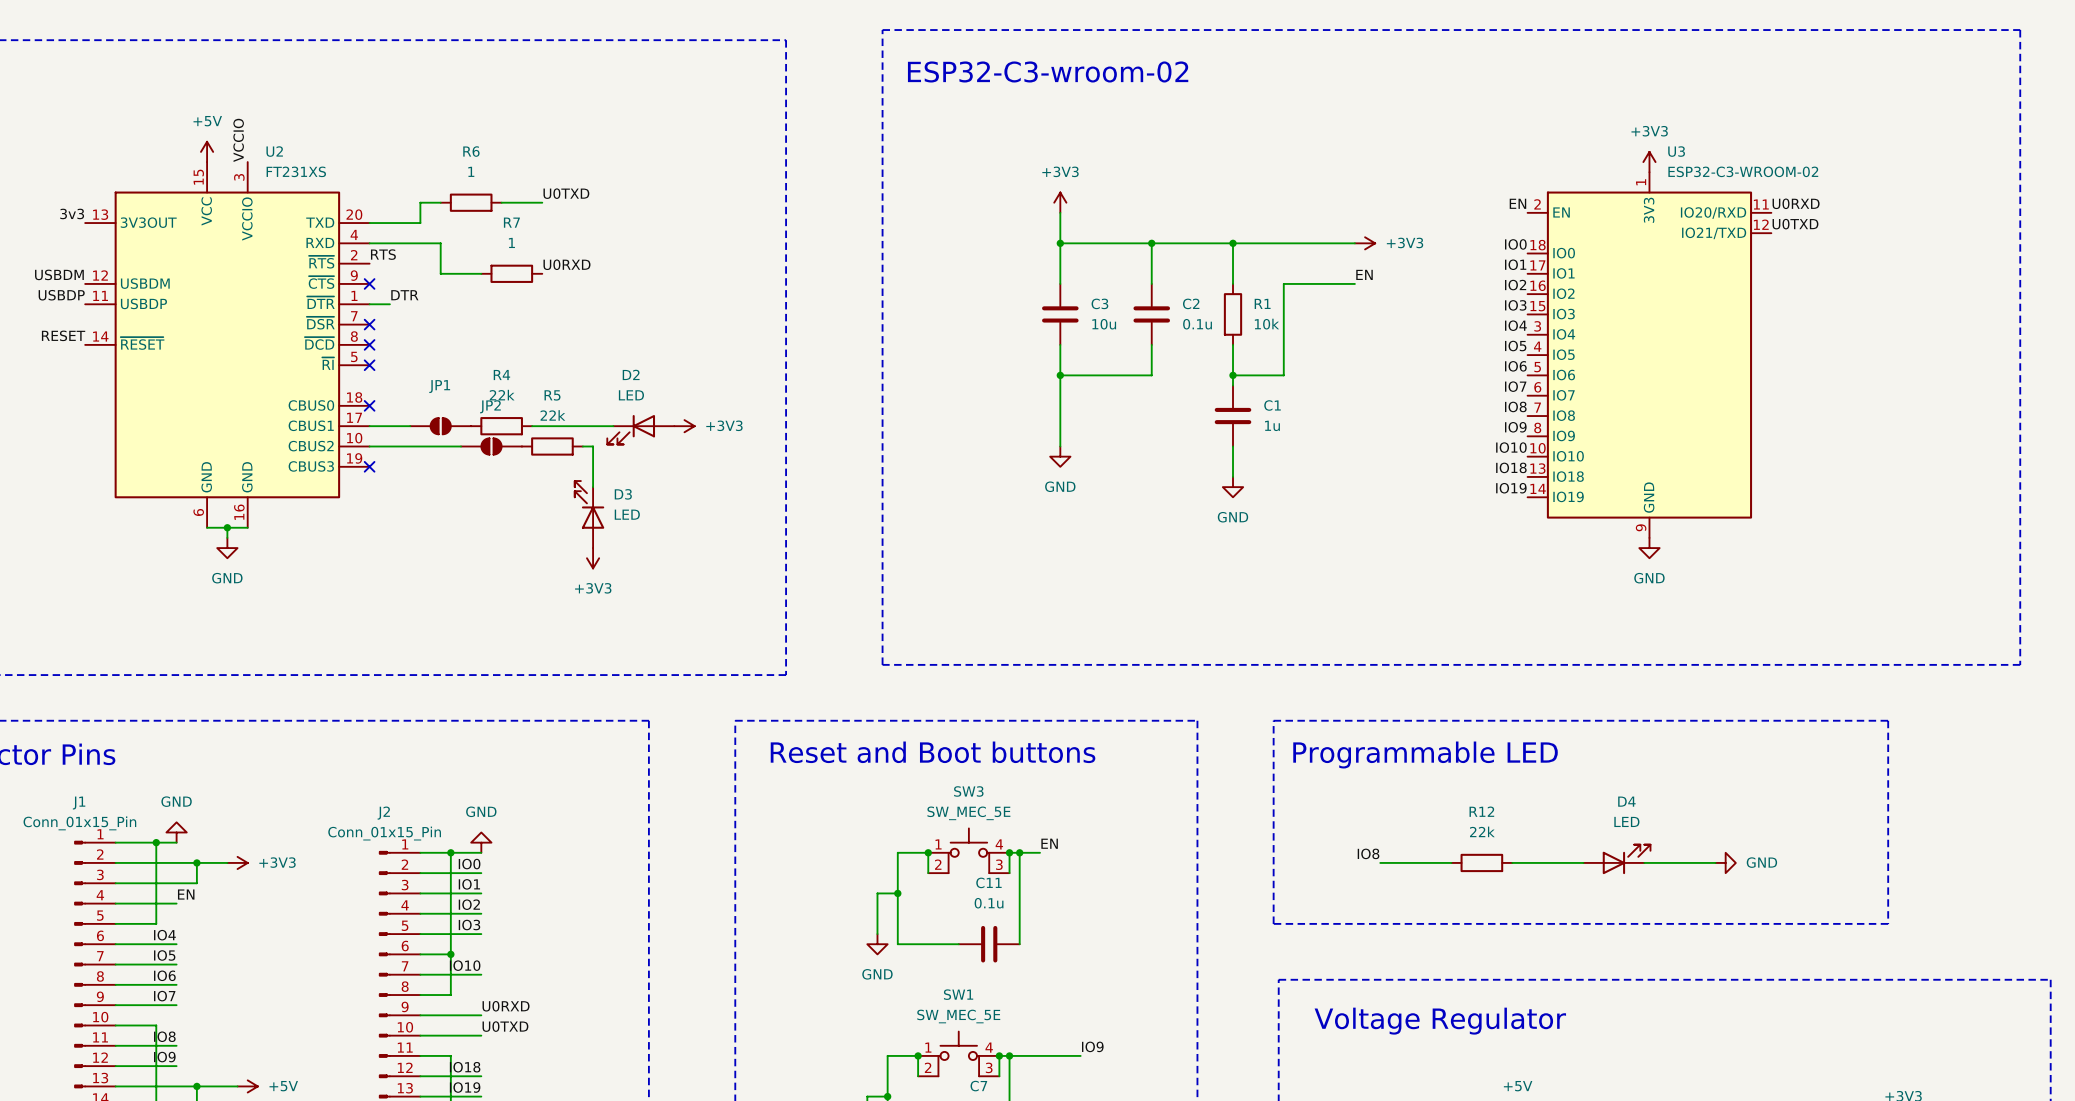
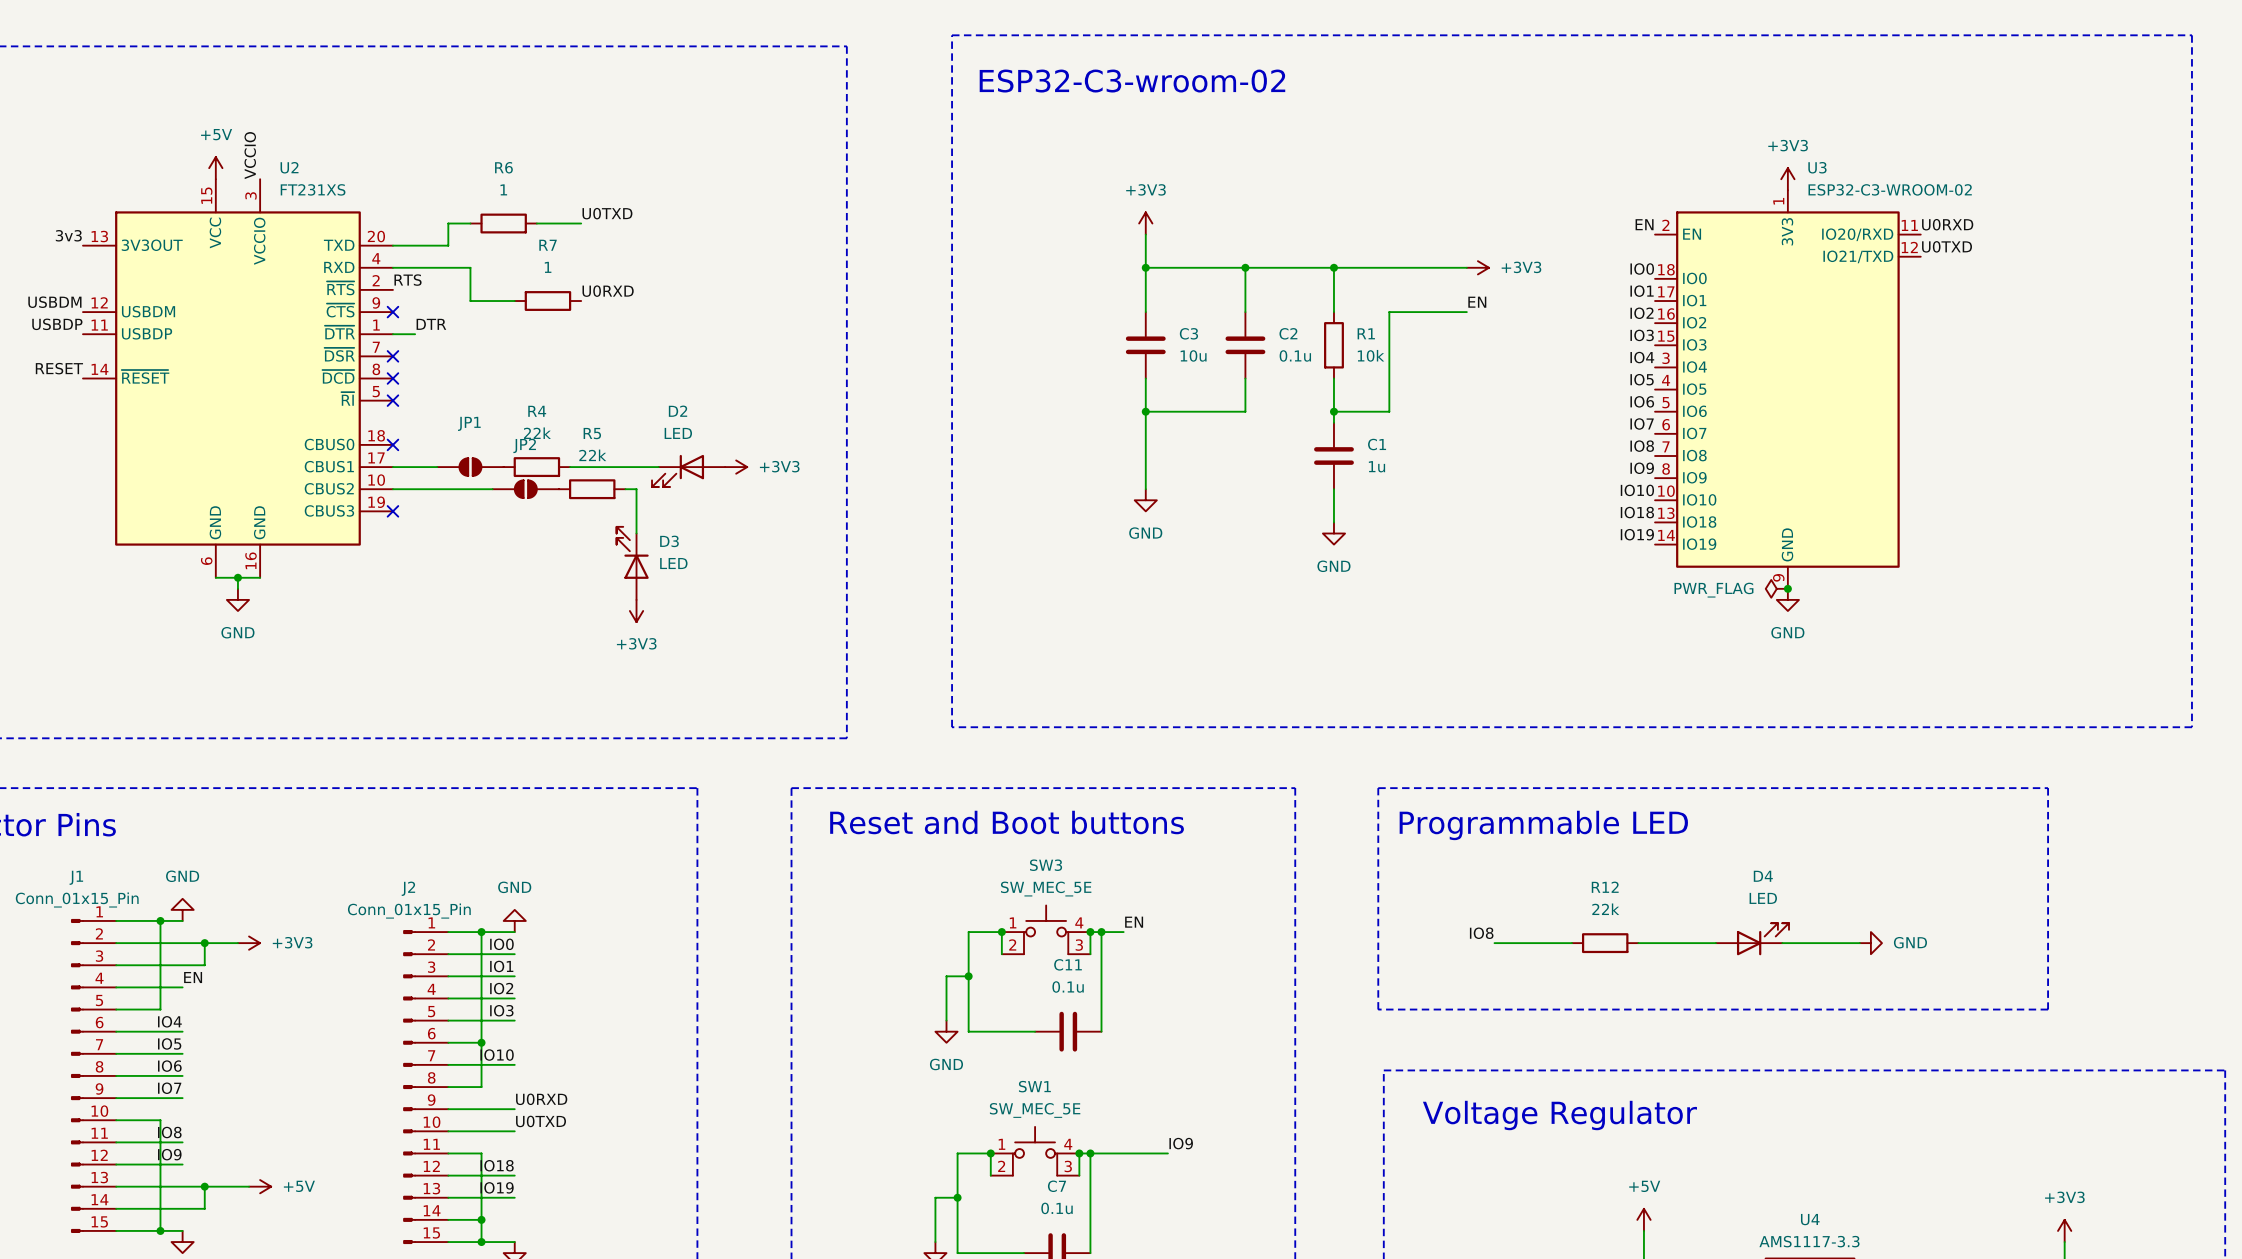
power symbol: none -> PWR_FLAG (1776, 588)
junction: none -> (1787, 588)

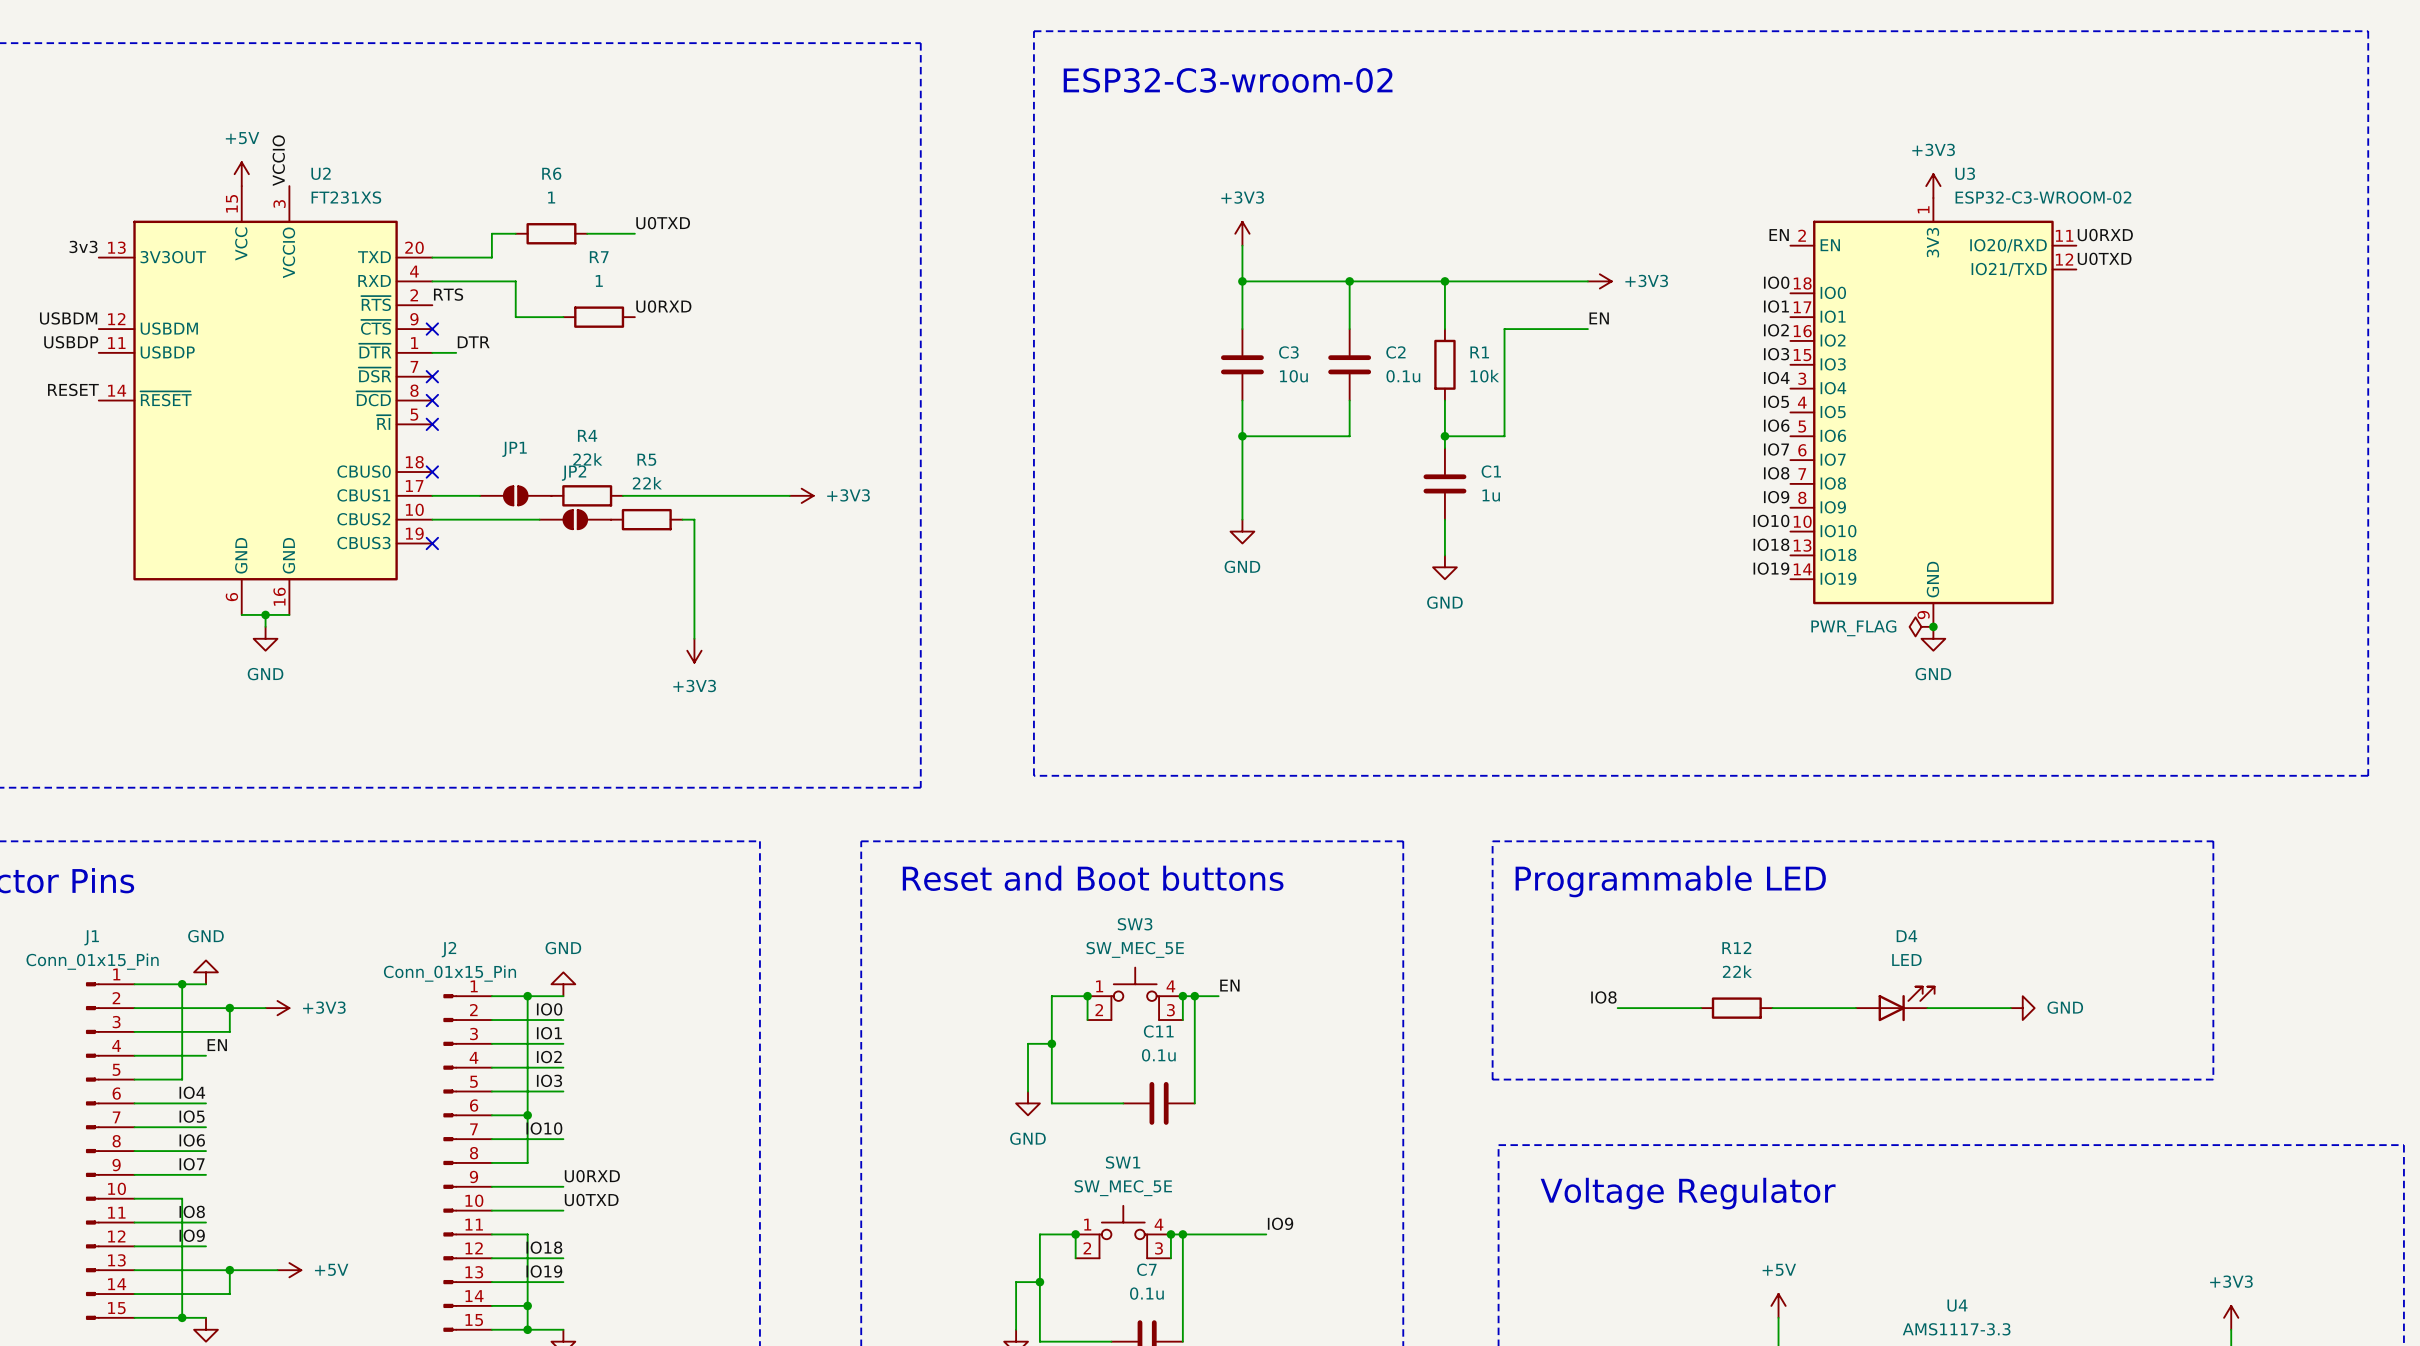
D2: LED (688, 470) -> none
D3: LED (632, 563) -> none

